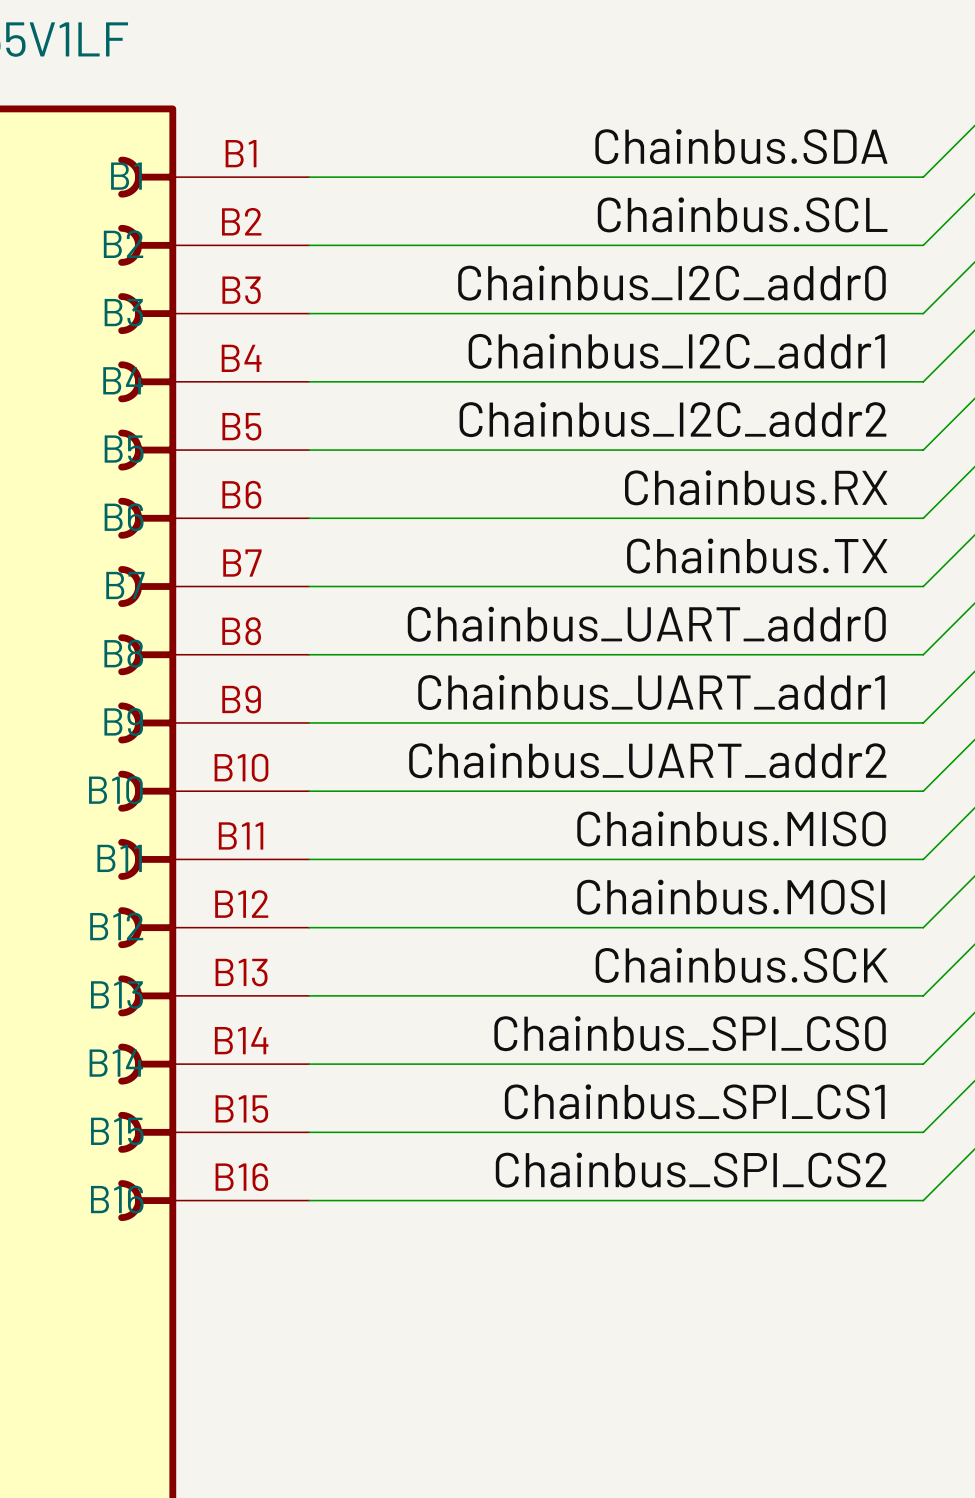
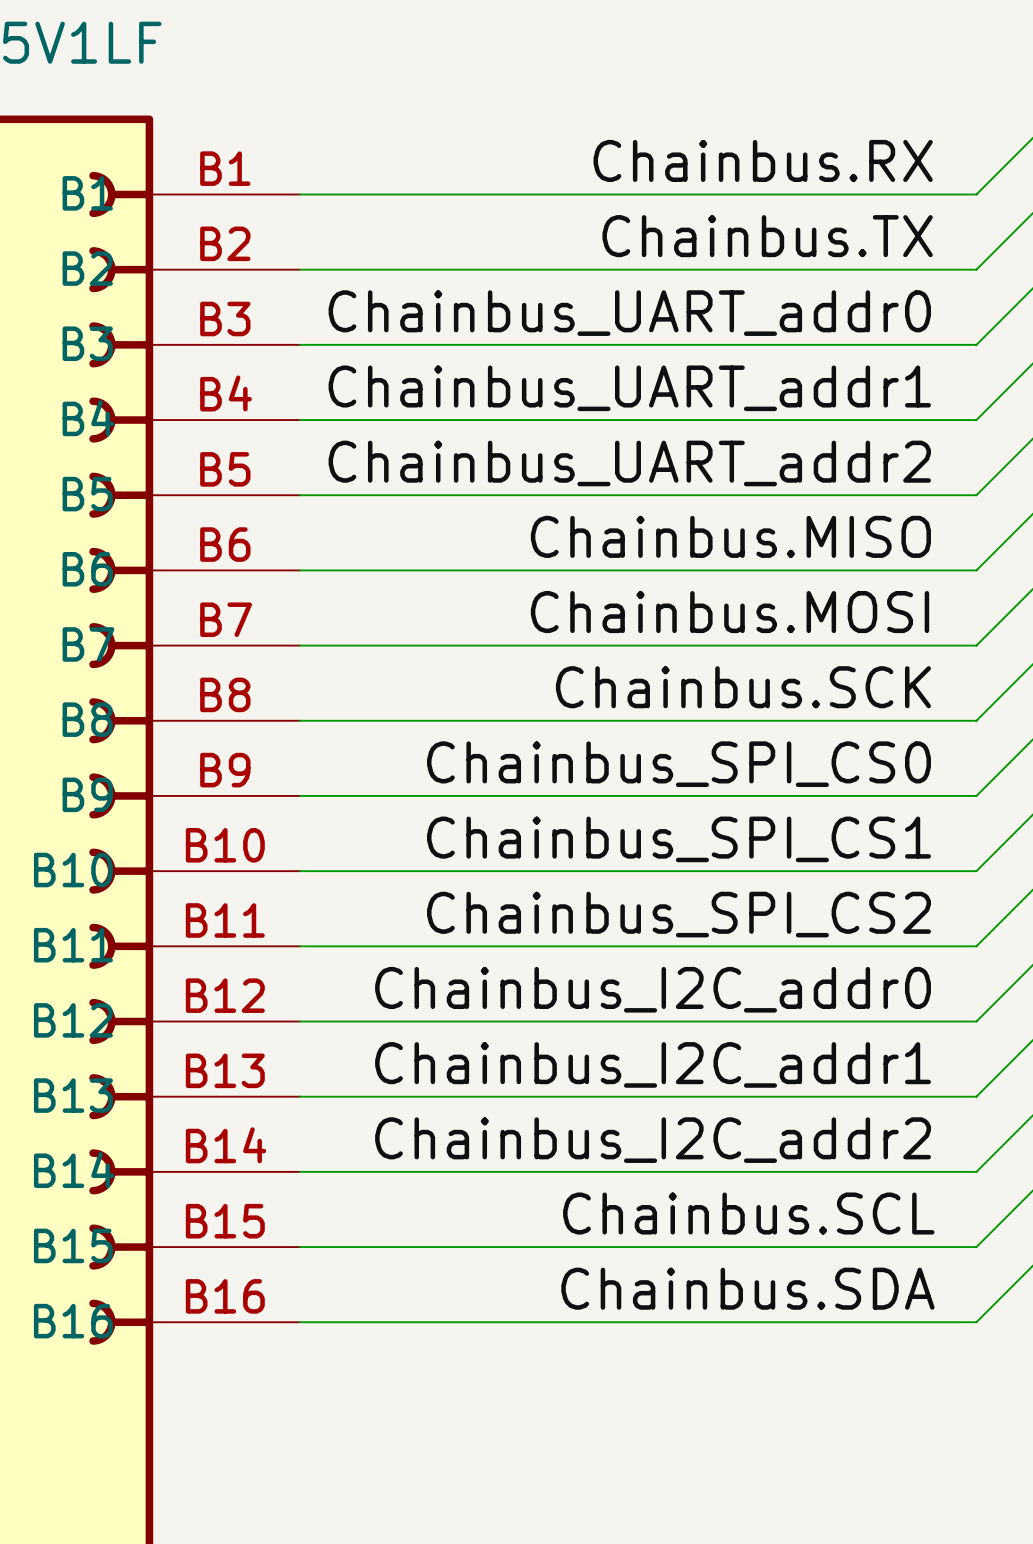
label: Chainbus.SDA (741, 146) -> Chainbus.RX (763, 160)
label: Chainbus.SCL (742, 214) -> Chainbus.TX (767, 236)
label: Chainbus_I2C_addr0 (671, 283) -> Chainbus_UART_addr0 (629, 313)
label: Chainbus_I2C_addr1 (676, 351) -> Chainbus_UART_addr1 (629, 388)
label: Chainbus_I2C_addr2 (672, 419) -> Chainbus_UART_addr2 (629, 463)
label: Chainbus.RX (756, 487) -> Chainbus.MISO (730, 536)
label: Chainbus.TX (757, 556) -> Chainbus.MOSI (730, 612)
label: Chainbus_UART_addr0 (646, 624) -> Chainbus.SCK (743, 687)
label: Chainbus_UART_addr1 (651, 692) -> Chainbus_SPI_CS0 (679, 764)
label: Chainbus_UART_addr2 (647, 760) -> Chainbus_SPI_CS1 (679, 839)
label: Chainbus.MISO (731, 828) -> Chainbus_SPI_CS2 (679, 914)
label: Chainbus.MOSI (730, 897) -> Chainbus_I2C_addr0 (653, 989)
label: Chainbus.SCK (741, 965) -> Chainbus_I2C_addr1 (653, 1064)
label: Chainbus_SPI_CS0 (690, 1033) -> Chainbus_I2C_addr2 (653, 1140)
label: Chainbus_SPI_CS1 (694, 1101) -> Chainbus.SCL (748, 1213)
label: Chainbus_SPI_CS2 (691, 1170) -> Chainbus.SDA (747, 1288)

